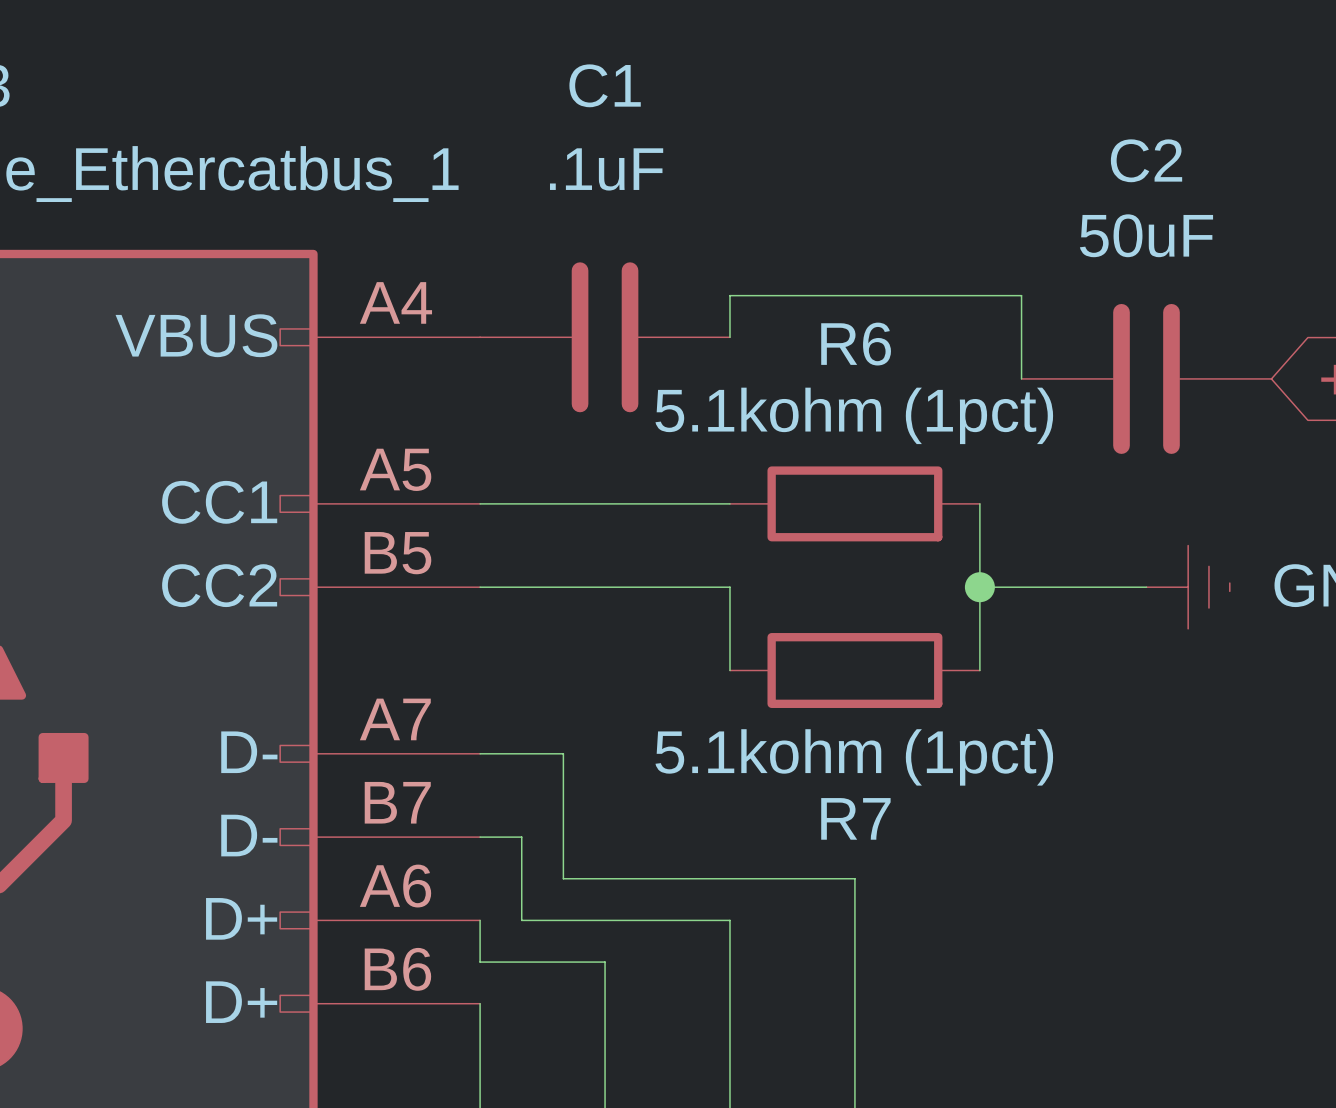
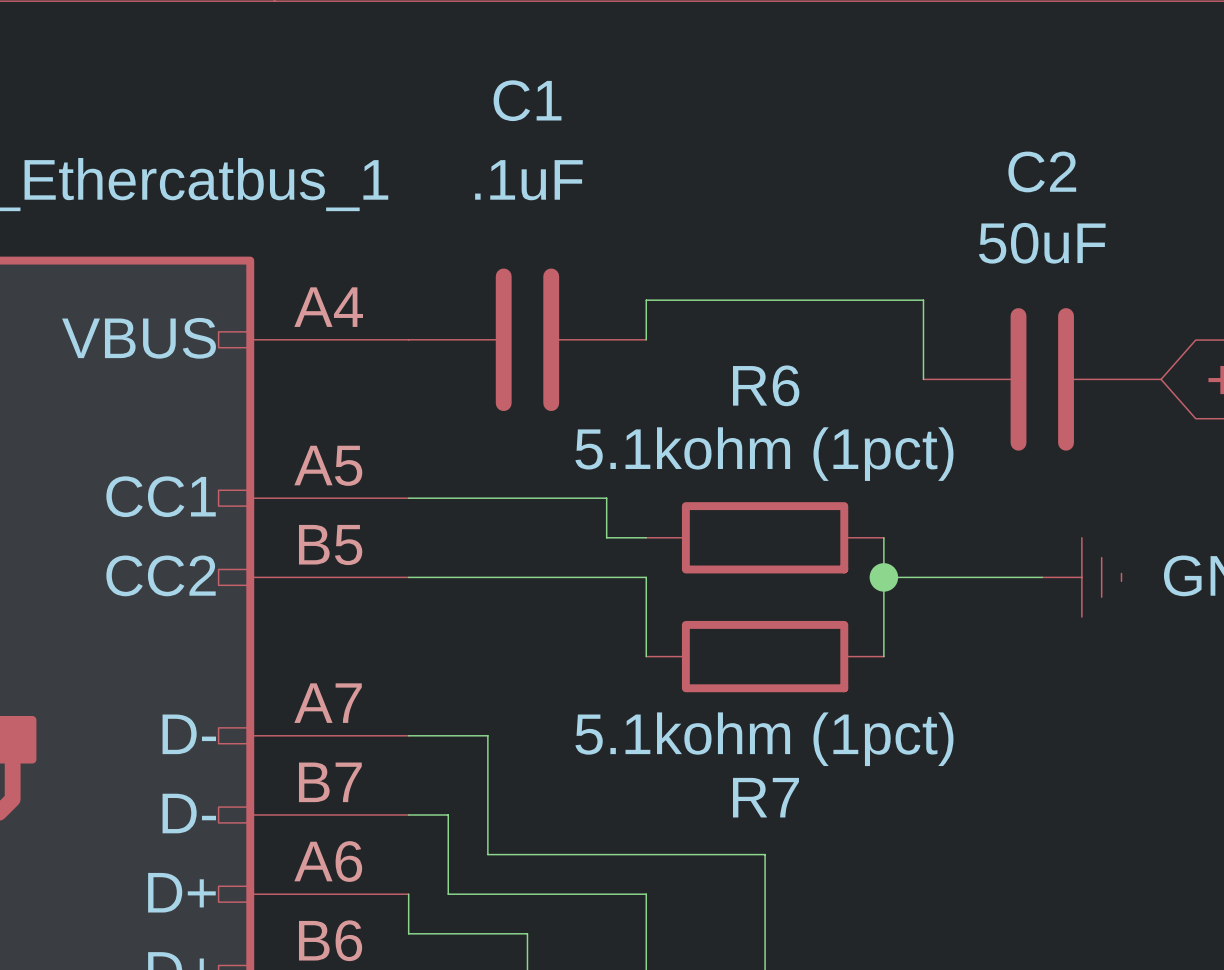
wire: (688, 503) (729, 503) -> (606, 498) (606, 537) (646, 537)
R6 position: (854, 503) -> (765, 537)
wire: (979, 503) (979, 545) -> none

